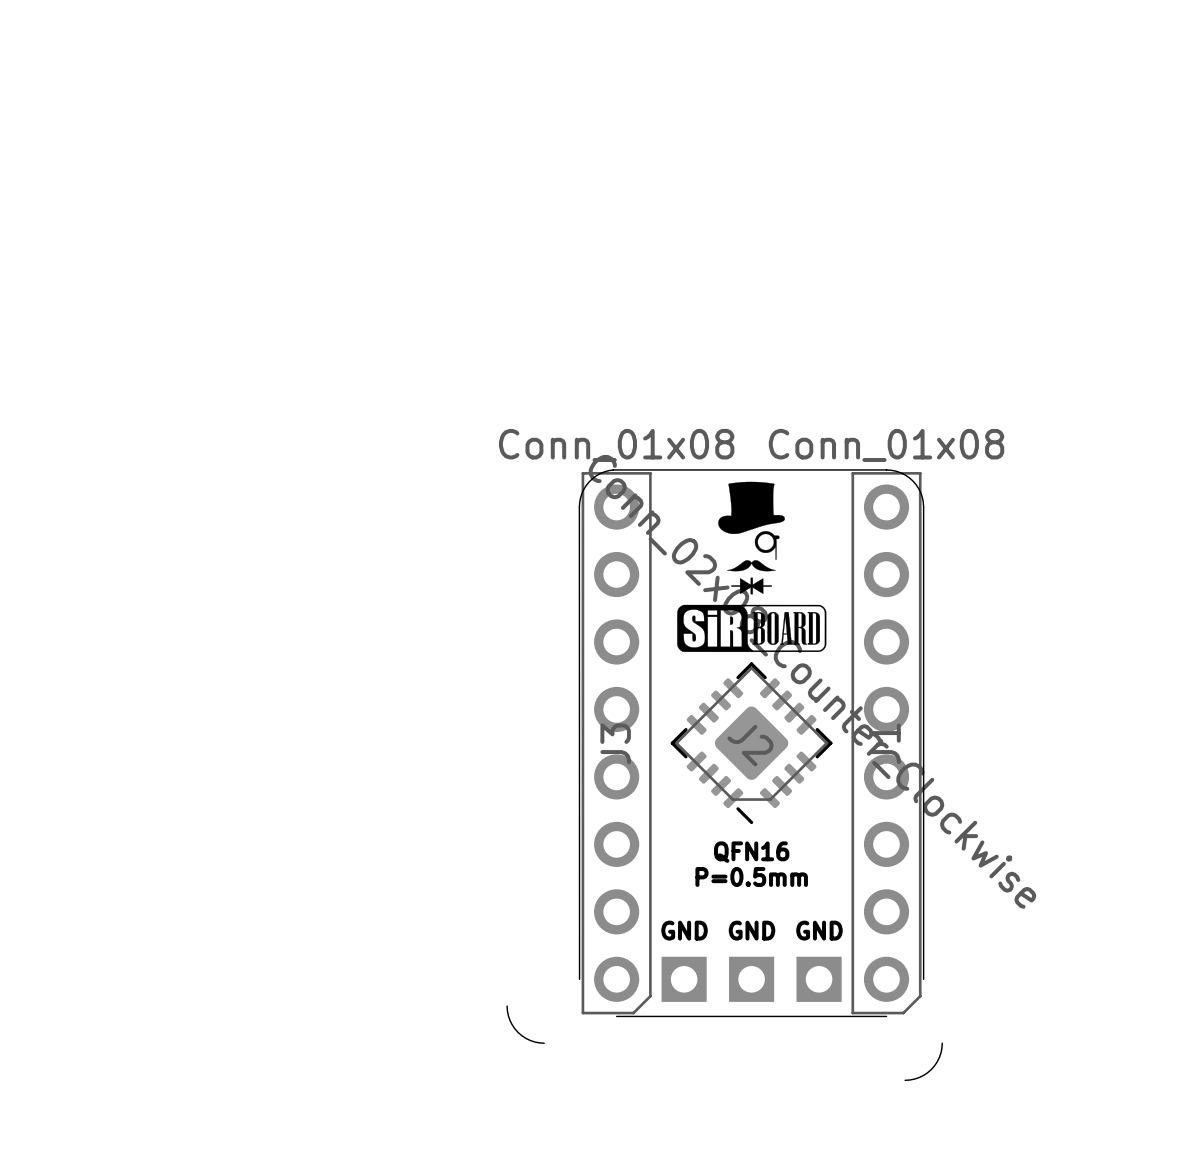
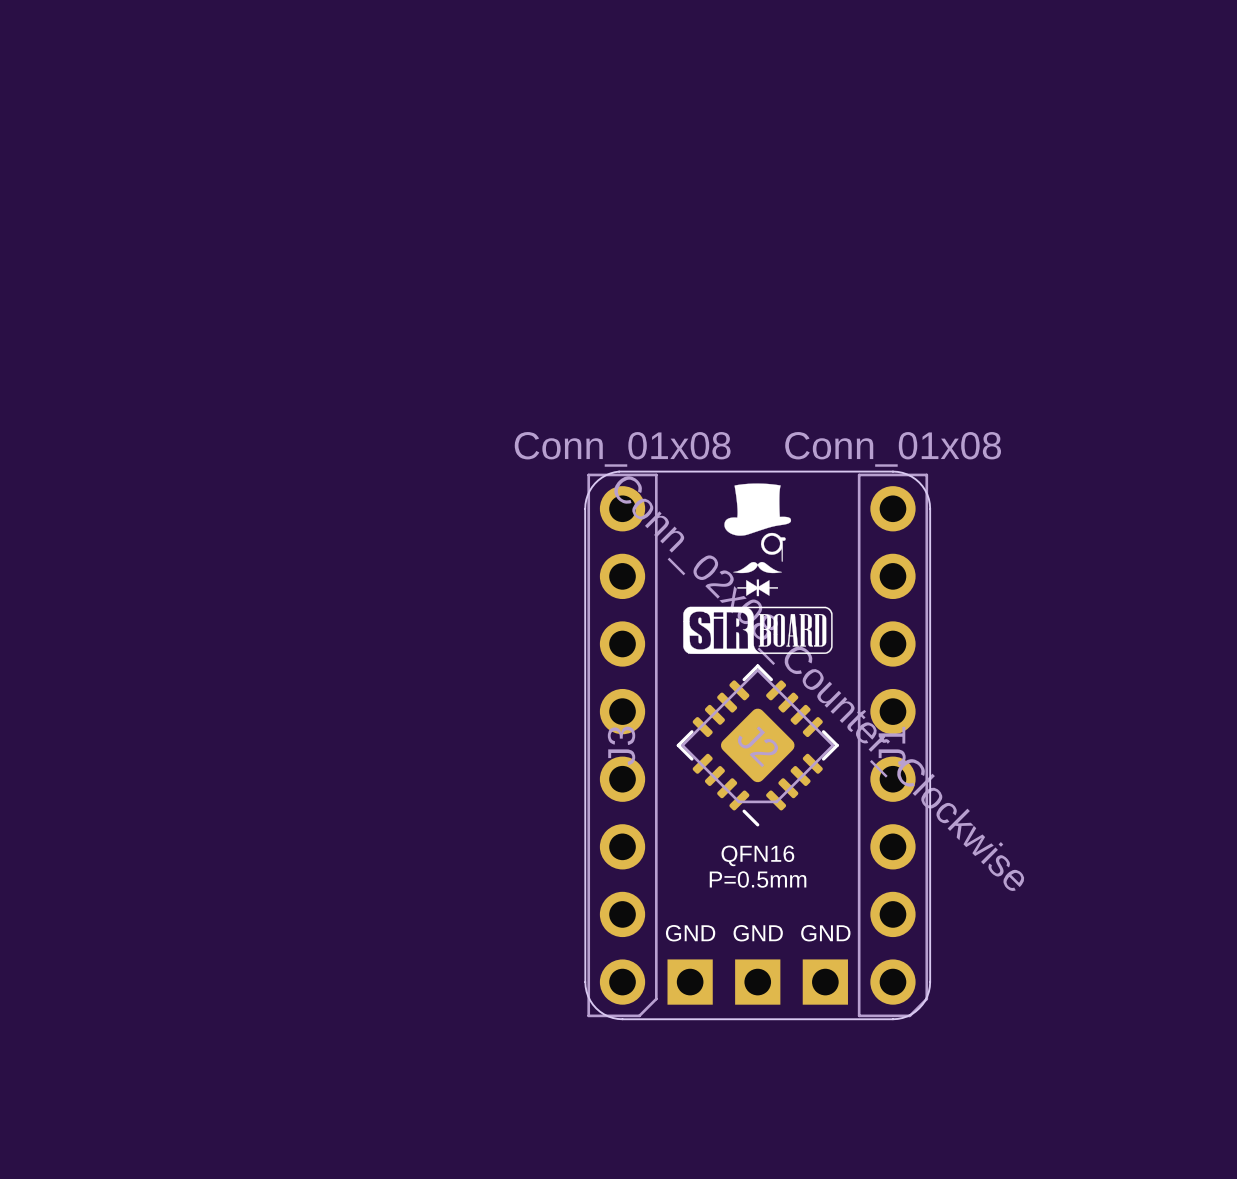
board edge: (507, 1006) (509, 1020) (517, 1032) (530, 1040) (544, 1043) -> (585, 982) (588, 996) (596, 1008) (608, 1016) (622, 1019)
board edge: (942, 1043) (939, 1057) (931, 1069) (919, 1077) (905, 1080) -> (930, 982) (927, 996) (919, 1008) (907, 1016) (892, 1019)

